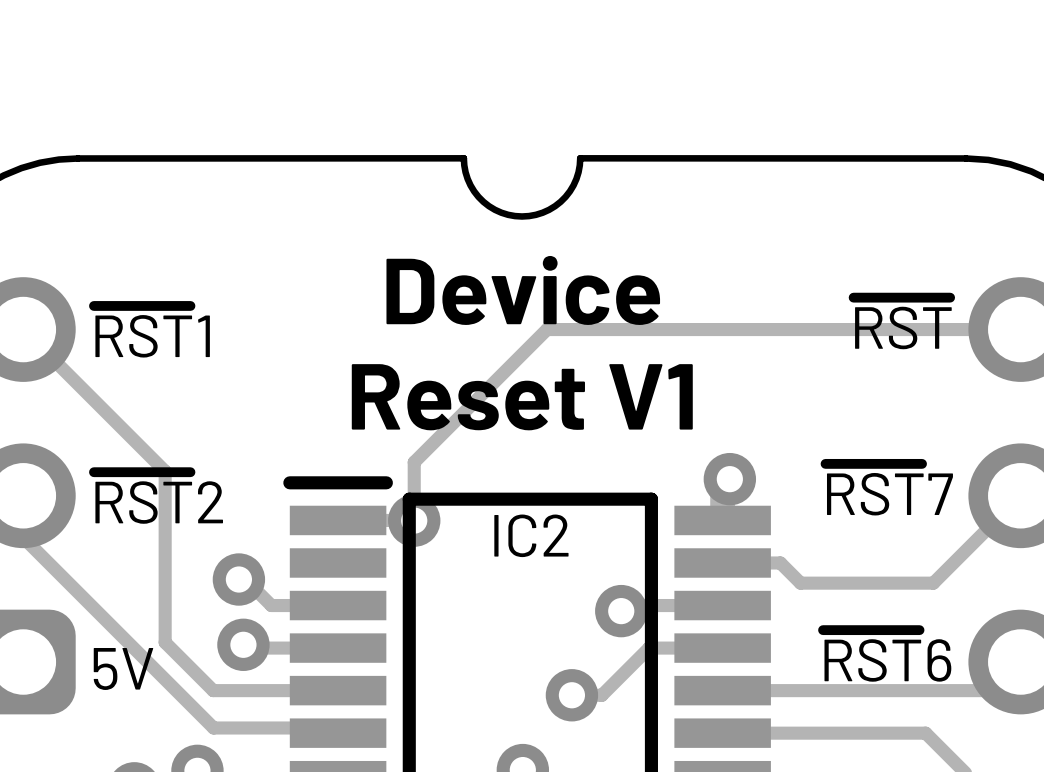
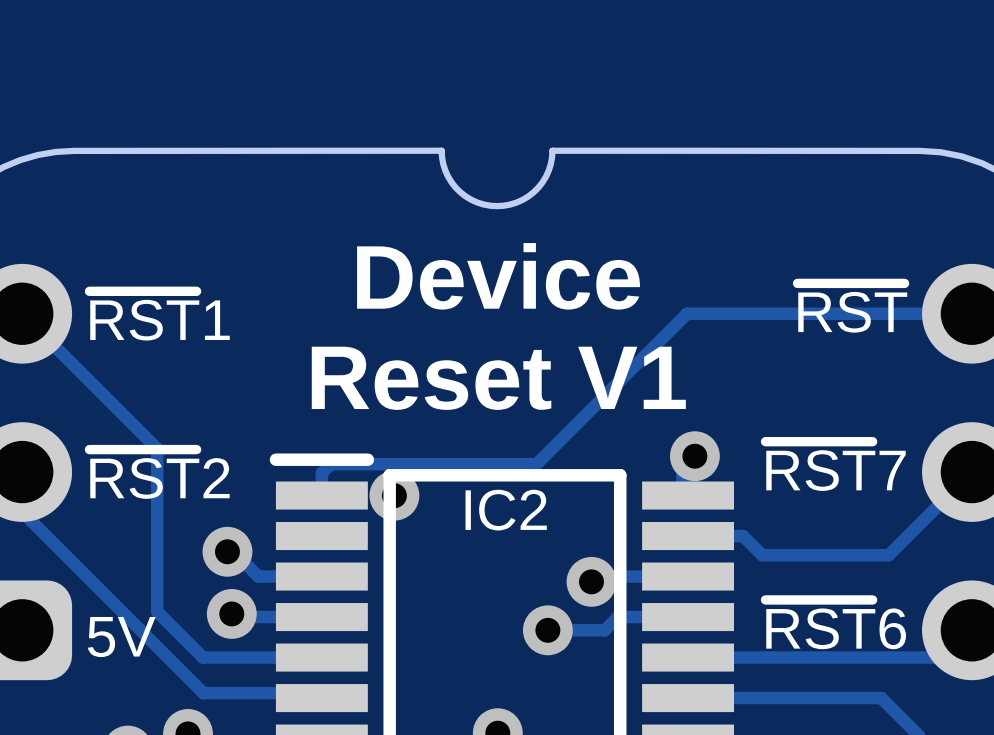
track: (721, 329) (546, 329) (414, 462) (414, 520) (338, 520) -> (686, 313) (536, 464) (330, 464) (321, 473) (321, 495)
track: (635, 662) (601, 695) (571, 695) -> (604, 630) (547, 630)
via position: (571, 695) -> (547, 630)

